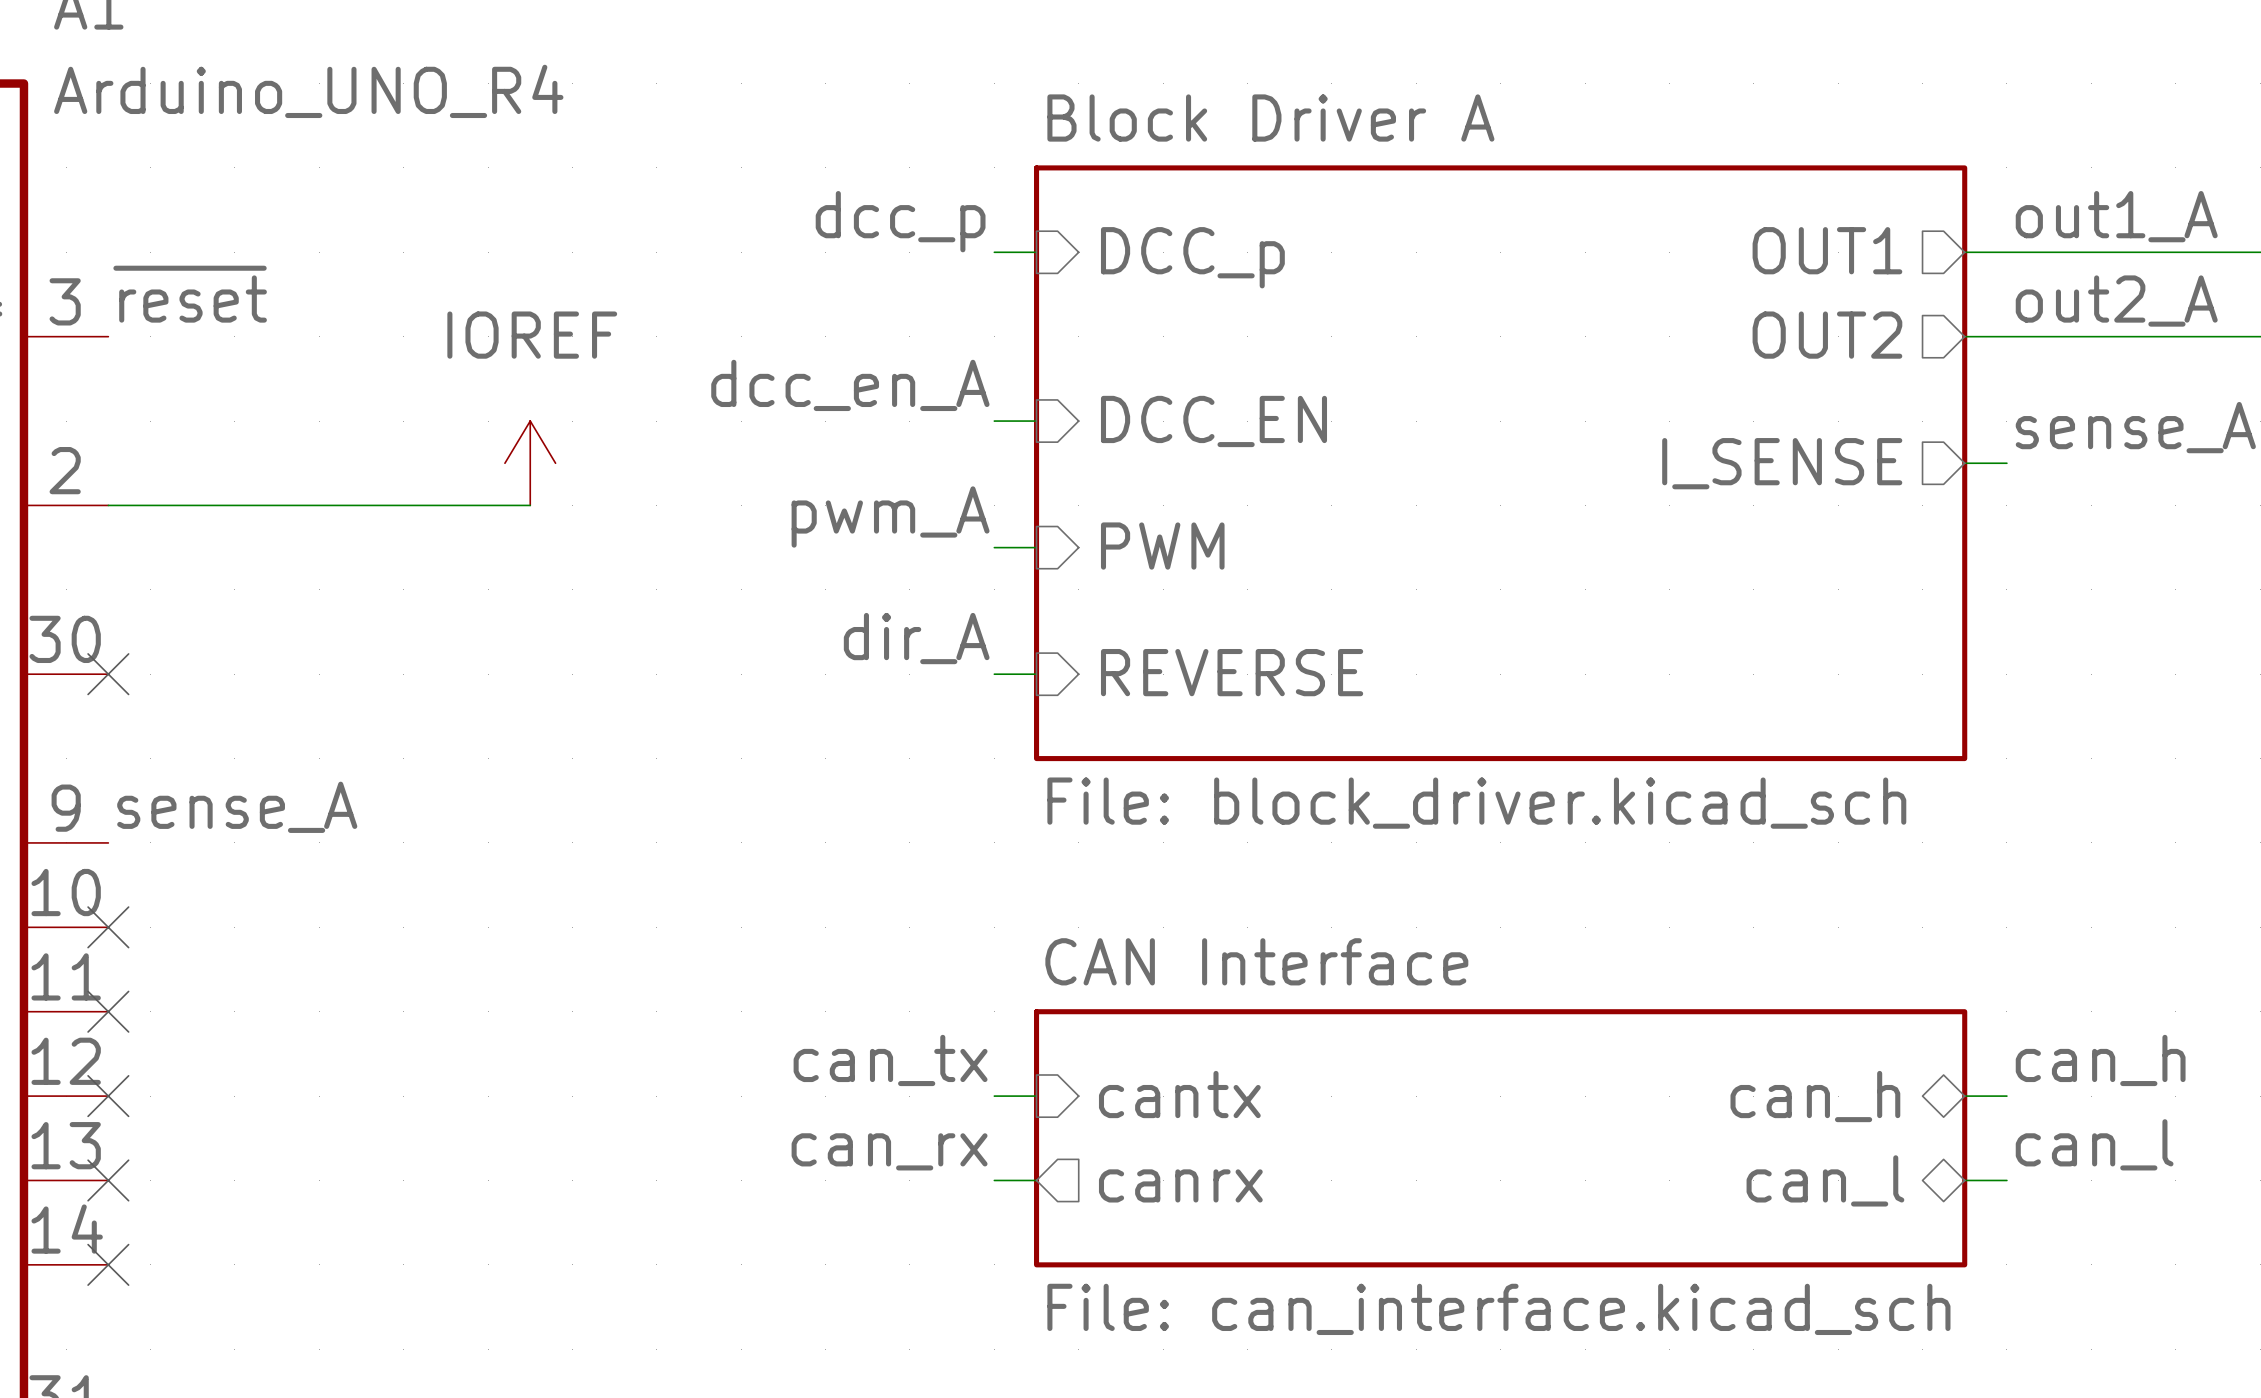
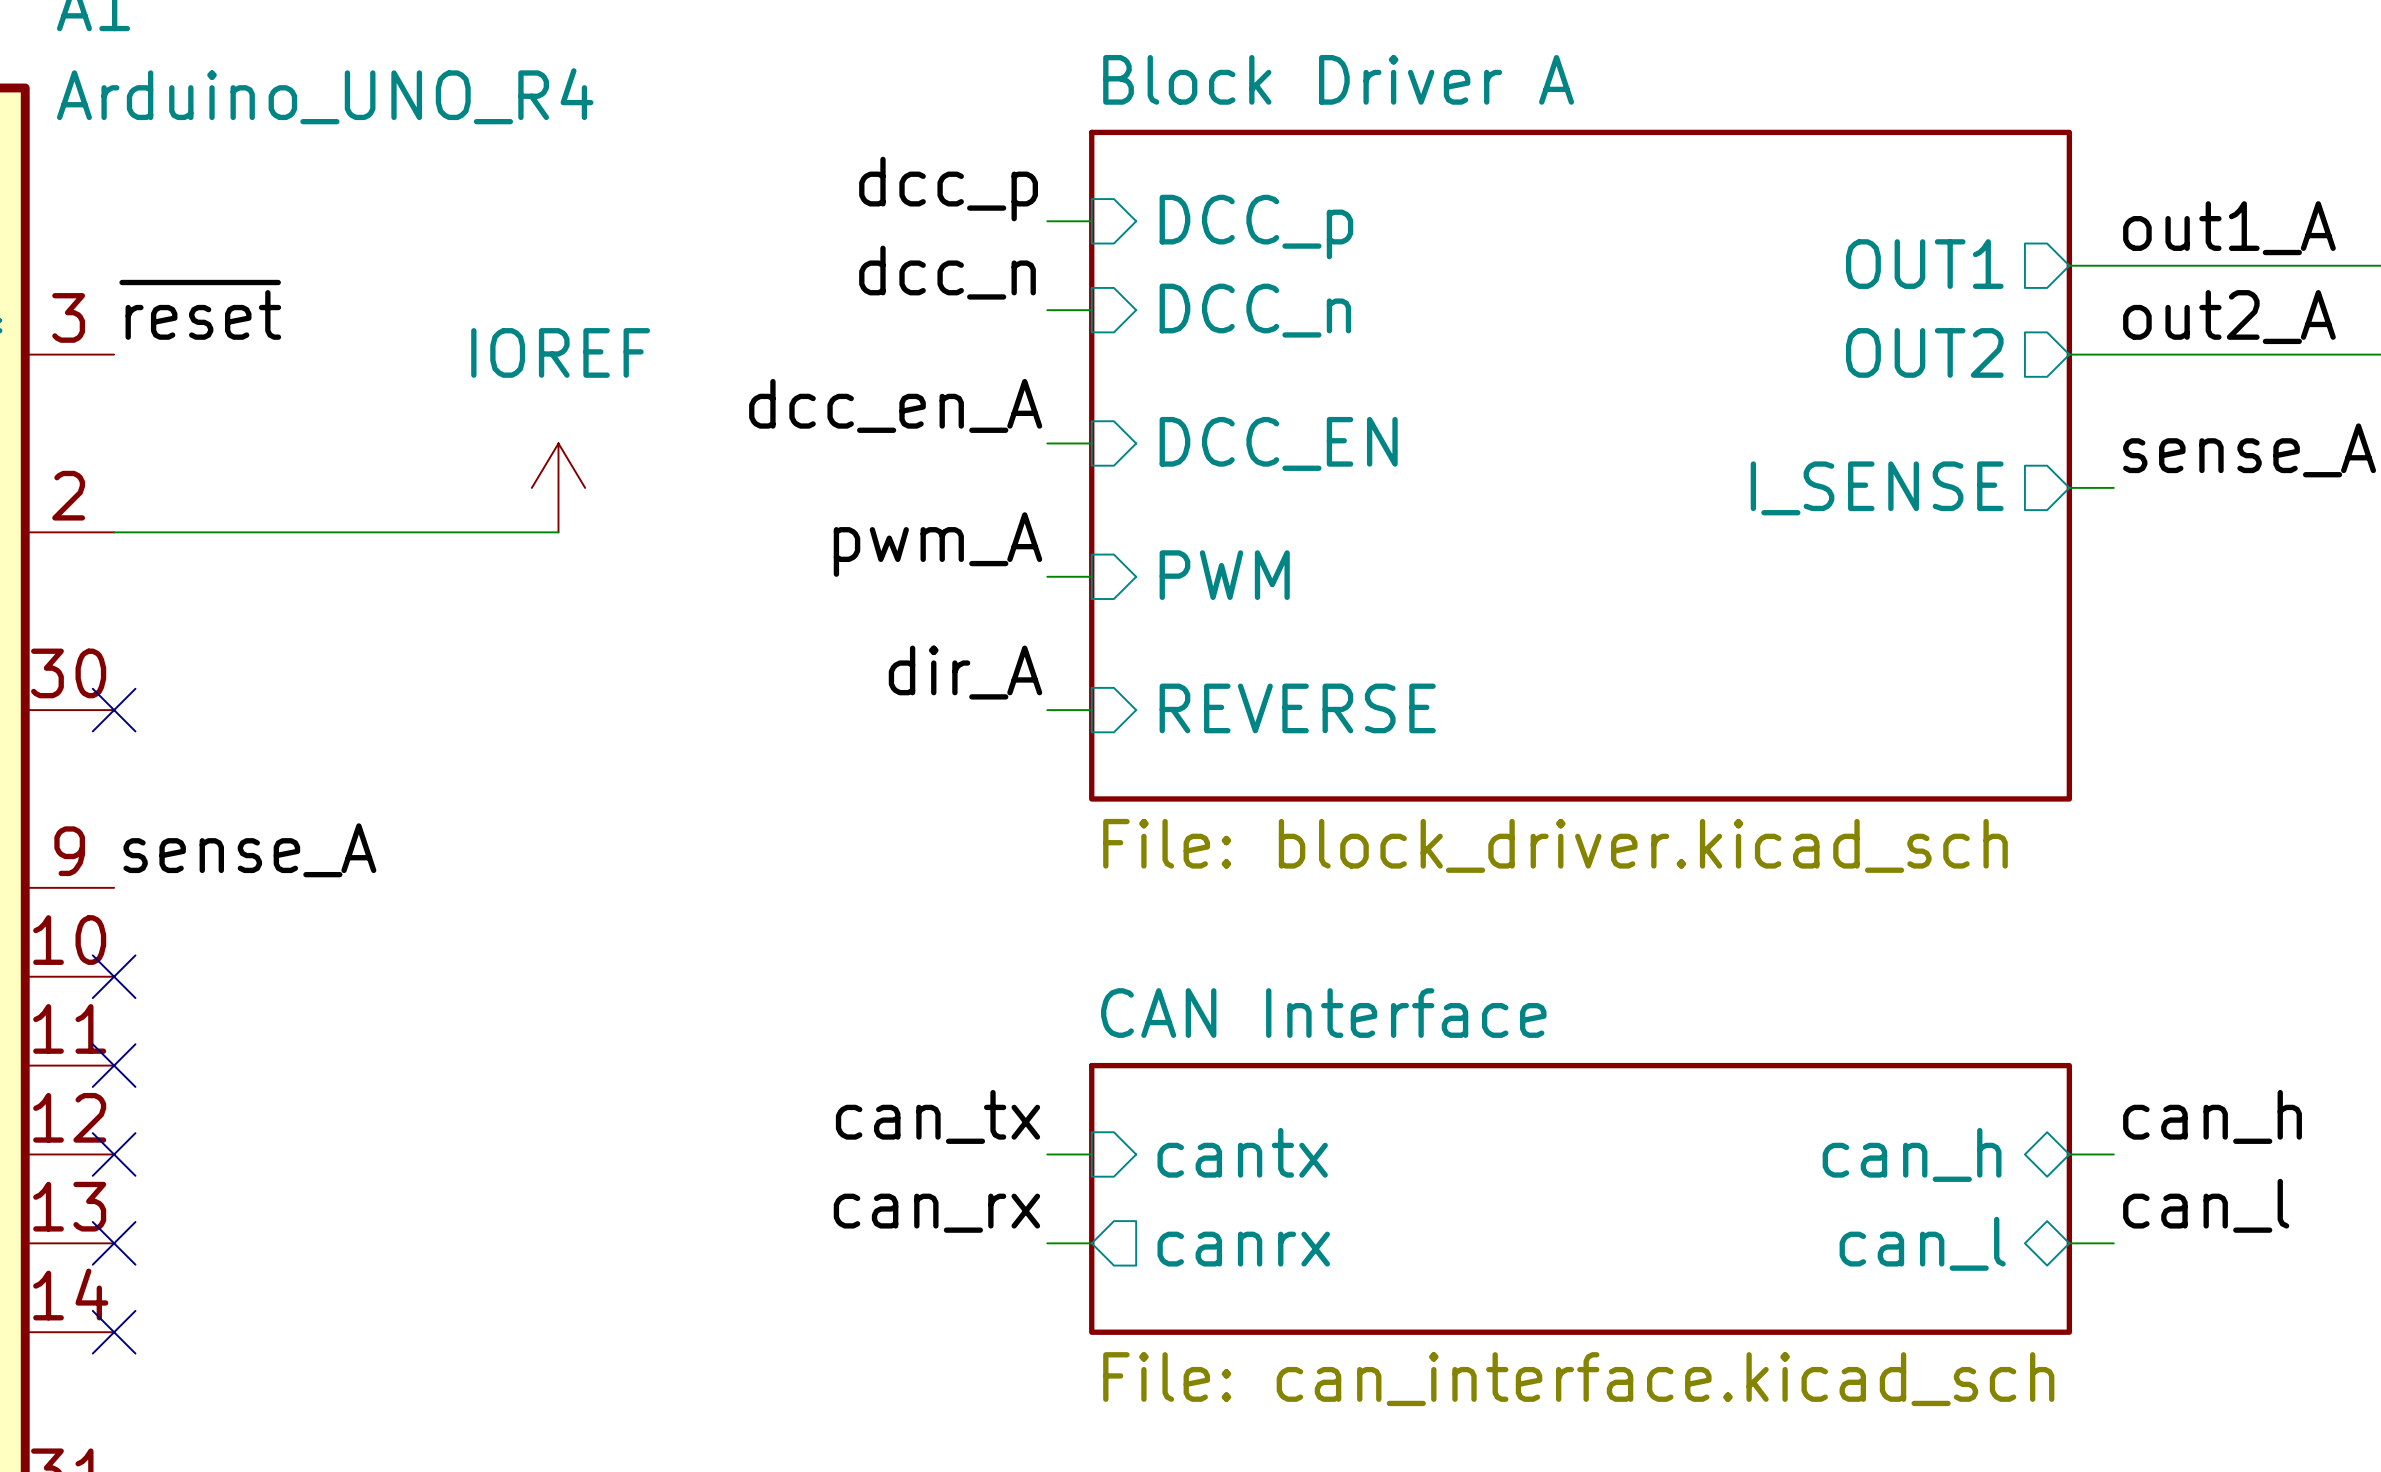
sheet Block Driver A shape: [1034, 165, 1968, 762] -> [1089, 129, 2073, 802]
label position: dcc_p (900, 221) -> dcc_p (948, 189)
wire: (994, 252) (1036, 252) -> (1047, 221) (1091, 221)
sheet pin position: DCC_p (1192, 257) -> DCC_p (1256, 227)
label: none -> dcc_n (947, 272)
wire: none -> (1047, 310) (1091, 310)
sheet pin: none -> DCC_n (1255, 310)

